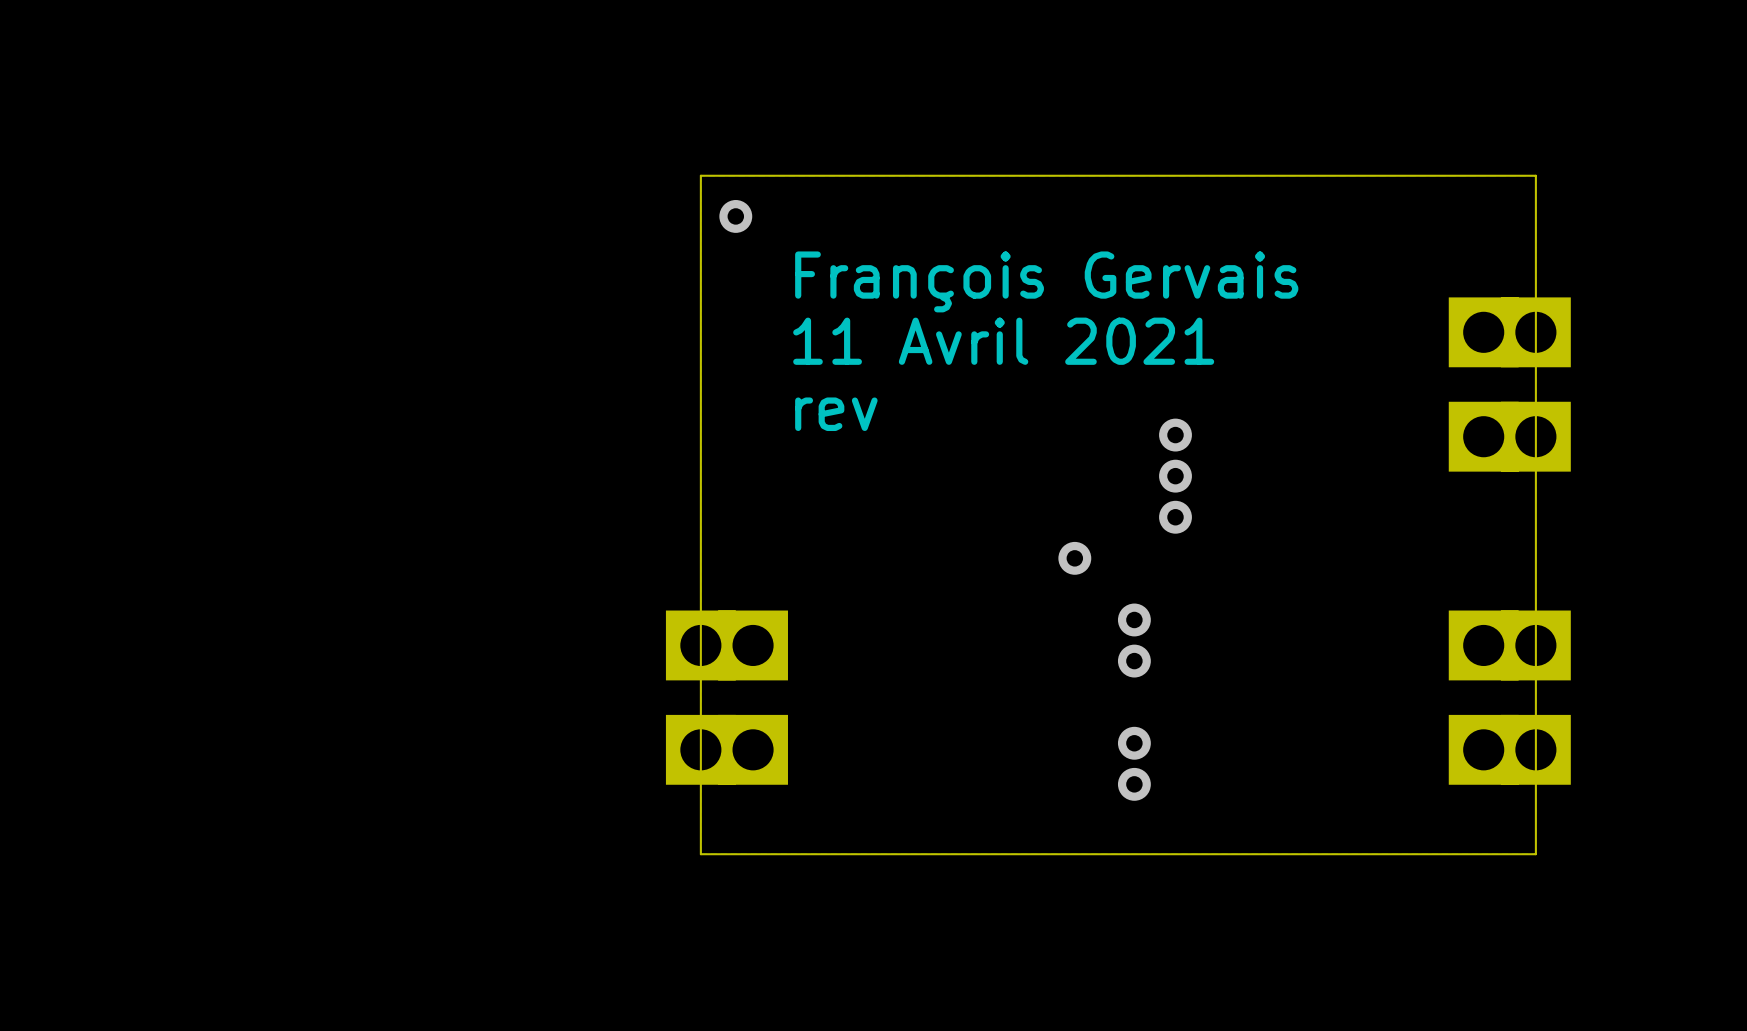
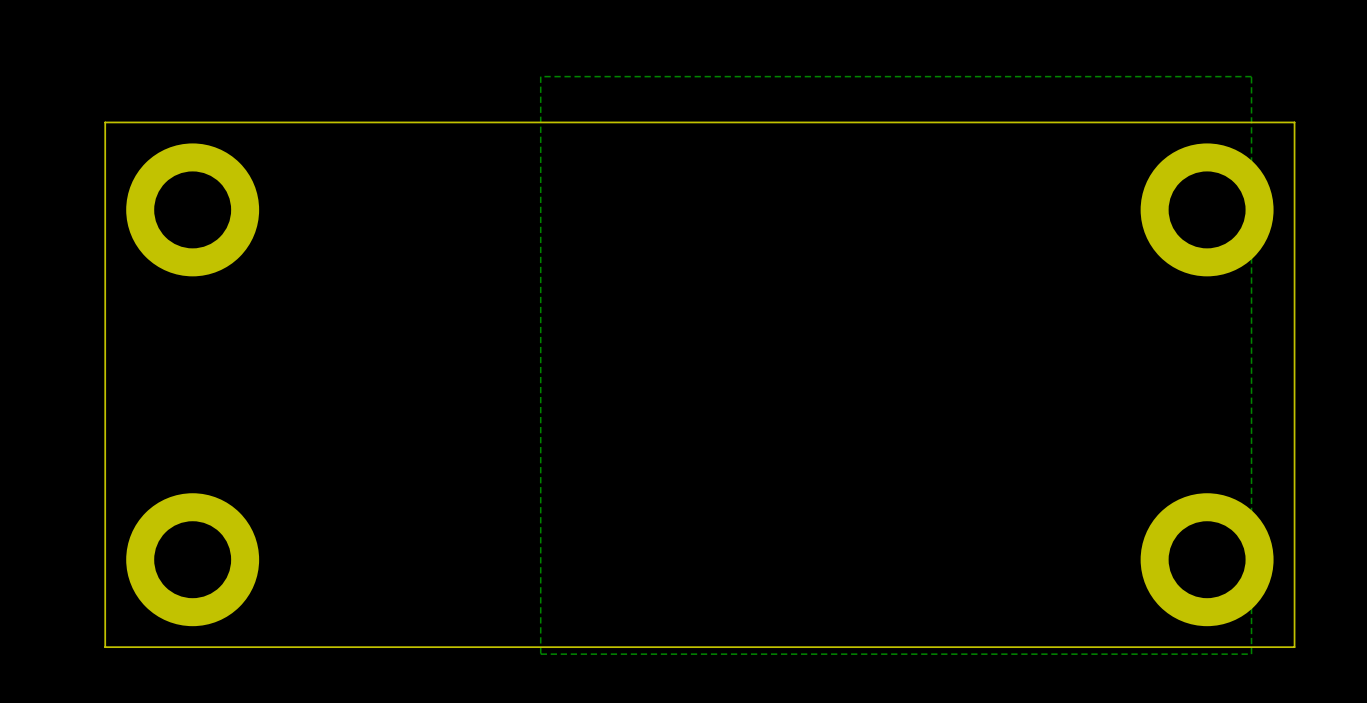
board edge: (1535, 175) (700, 175) (700, 854) (1535, 854) (1535, 175) -> (1294, 122) (1294, 647) (105, 647) (105, 122) (1294, 122)
via: (735, 216) -> none
text: François Gervais (1046, 281) -> none
part: none -> (192, 209)
part: none -> (1207, 209)
text: 11 Avril 2021 (1003, 341) -> none
part: (1509, 384) -> none
text: rev (836, 414) -> none
via: (1175, 435) -> none
via: (1175, 476) -> none
via: (1175, 517) -> none
via: (1074, 558) -> none
via: (1134, 619) -> none
via: (1134, 661) -> none
part: (726, 697) -> none
part: (1509, 697) -> none
part: none -> (192, 559)
via: (1134, 743) -> none
part: none -> (1207, 559)
via: (1134, 784) -> none

